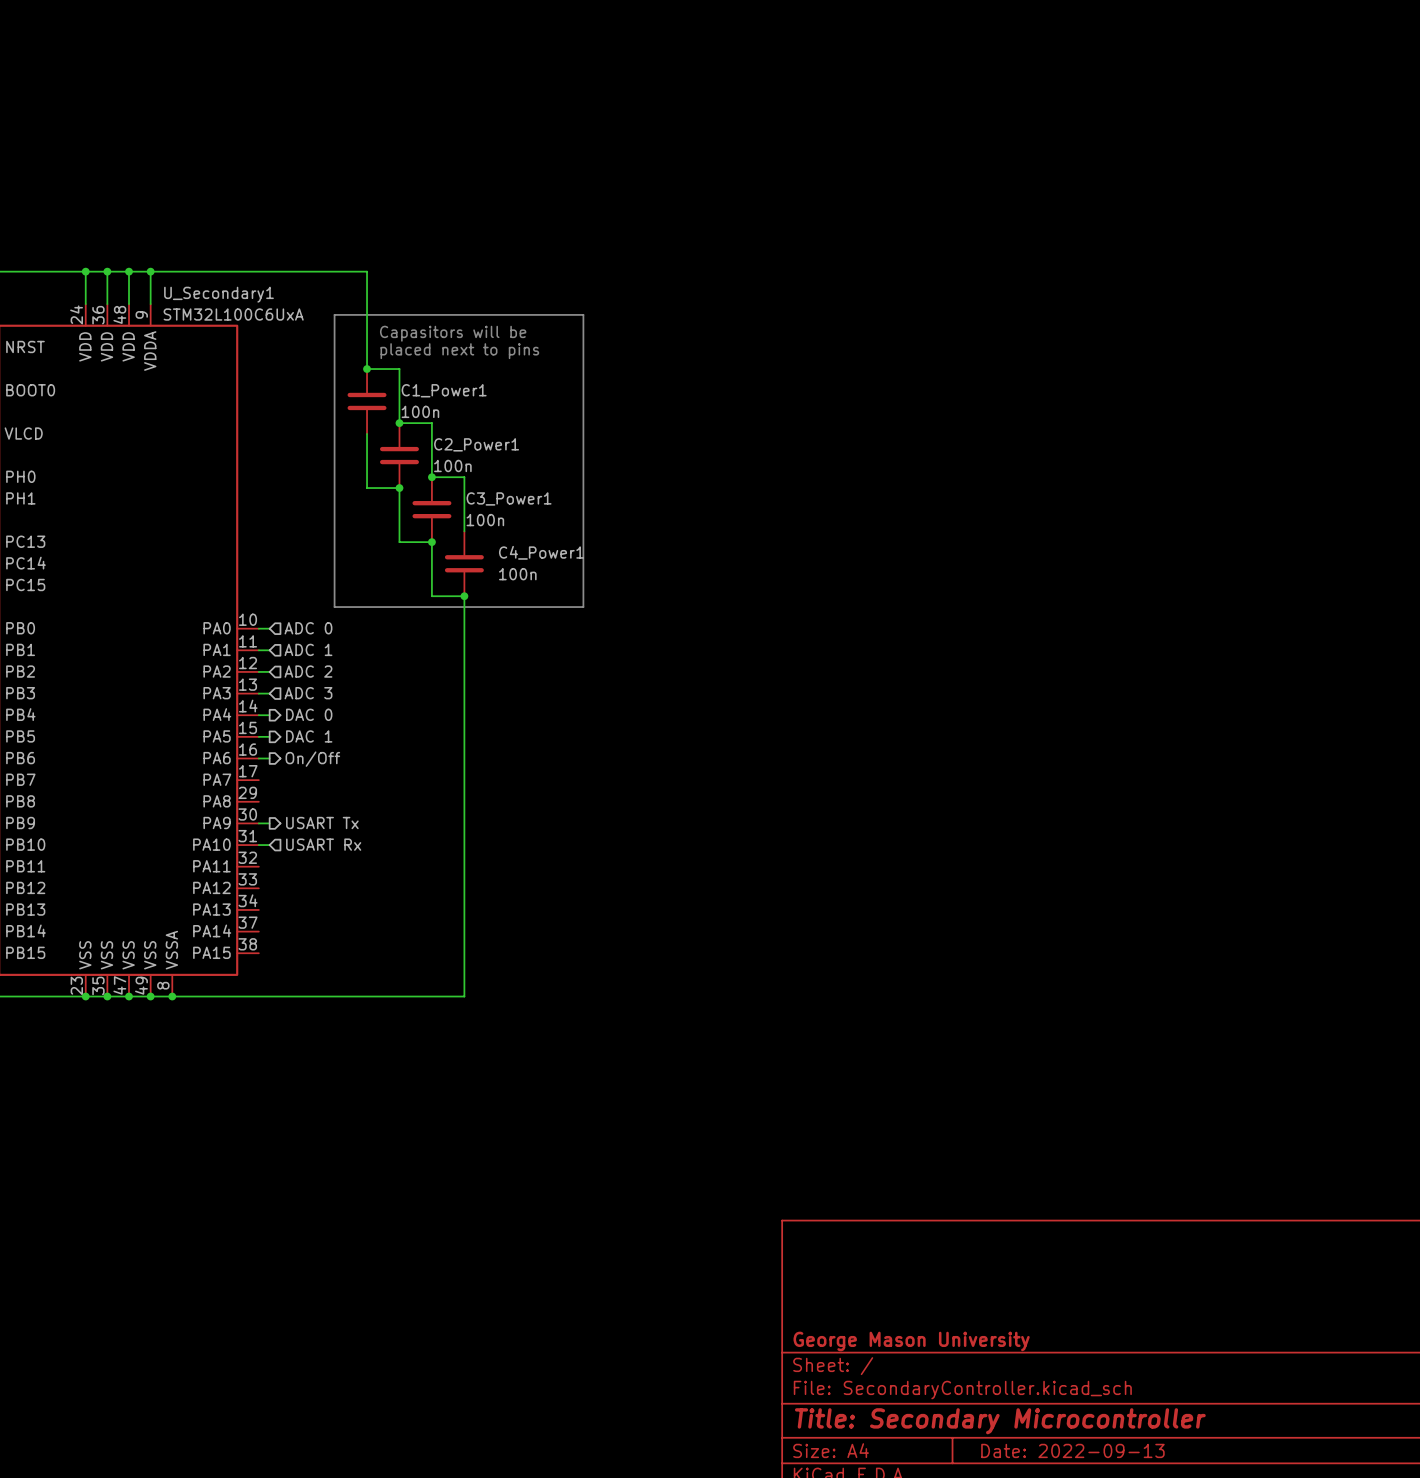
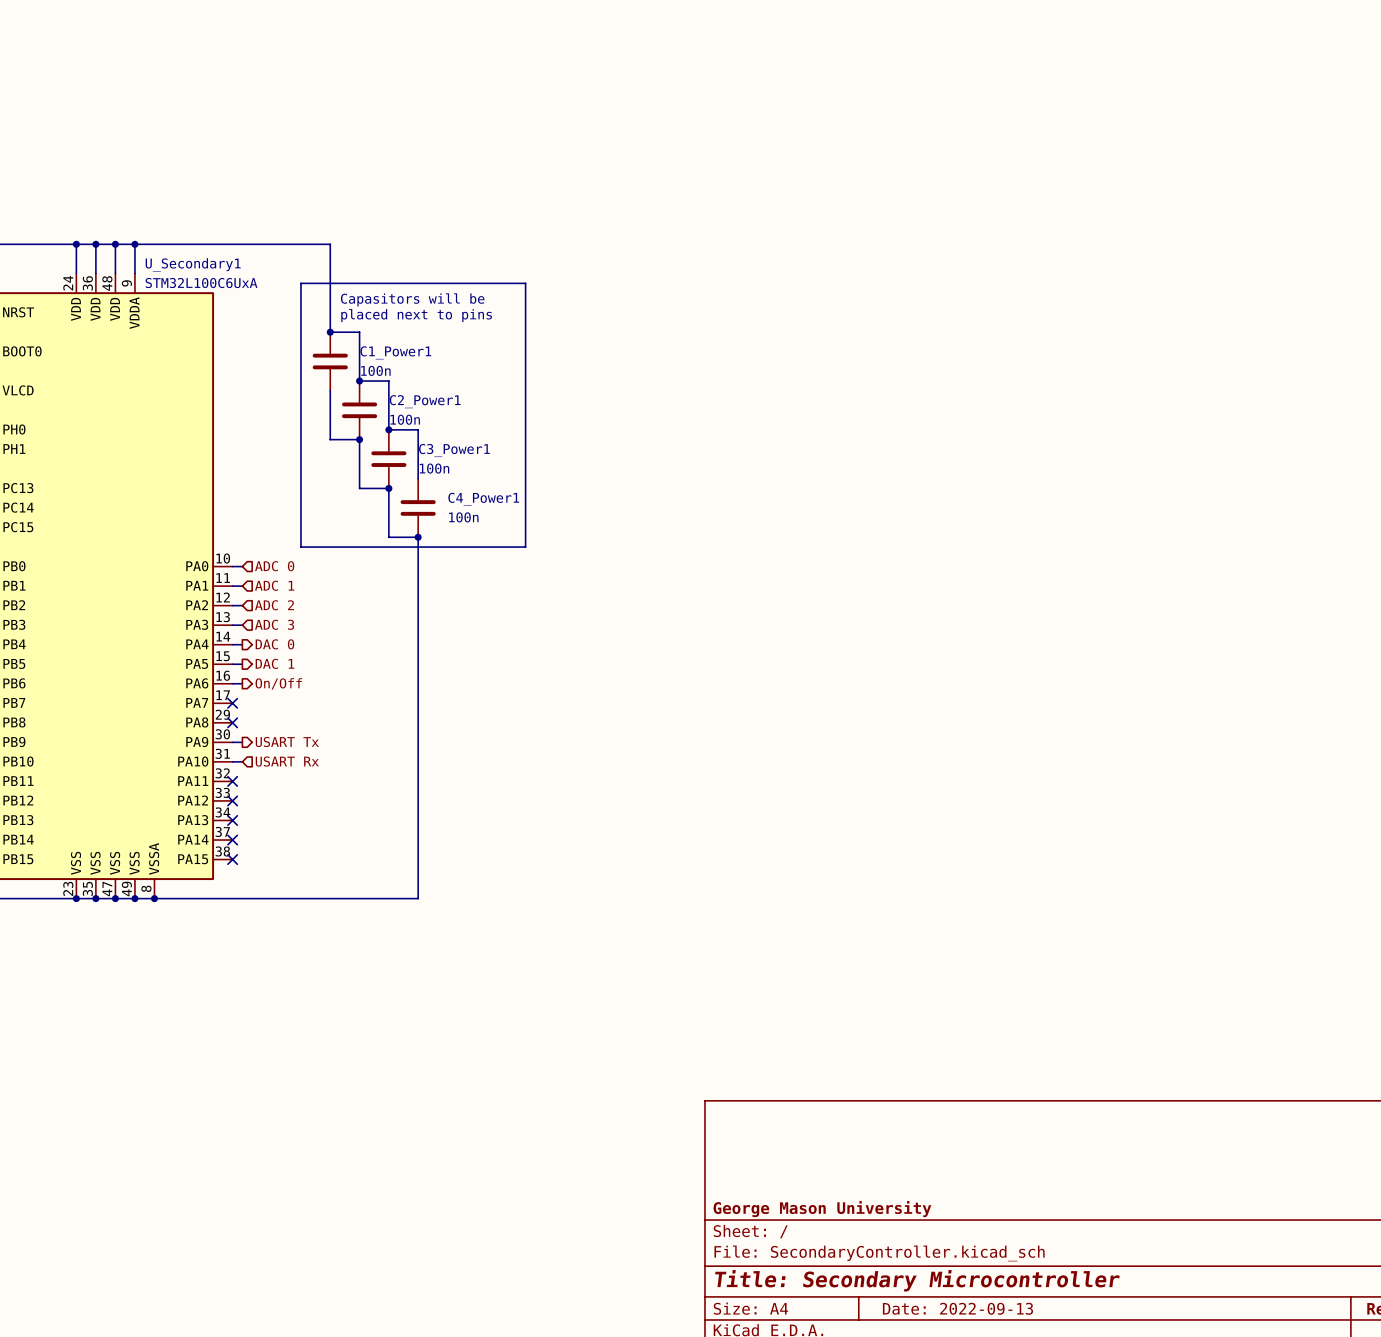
no-connect mark: none -> (232, 703)
no-connect mark: none -> (232, 722)
no-connect mark: none -> (232, 781)
no-connect mark: none -> (232, 800)
no-connect mark: none -> (232, 820)
no-connect mark: none -> (232, 840)
no-connect mark: none -> (232, 859)

